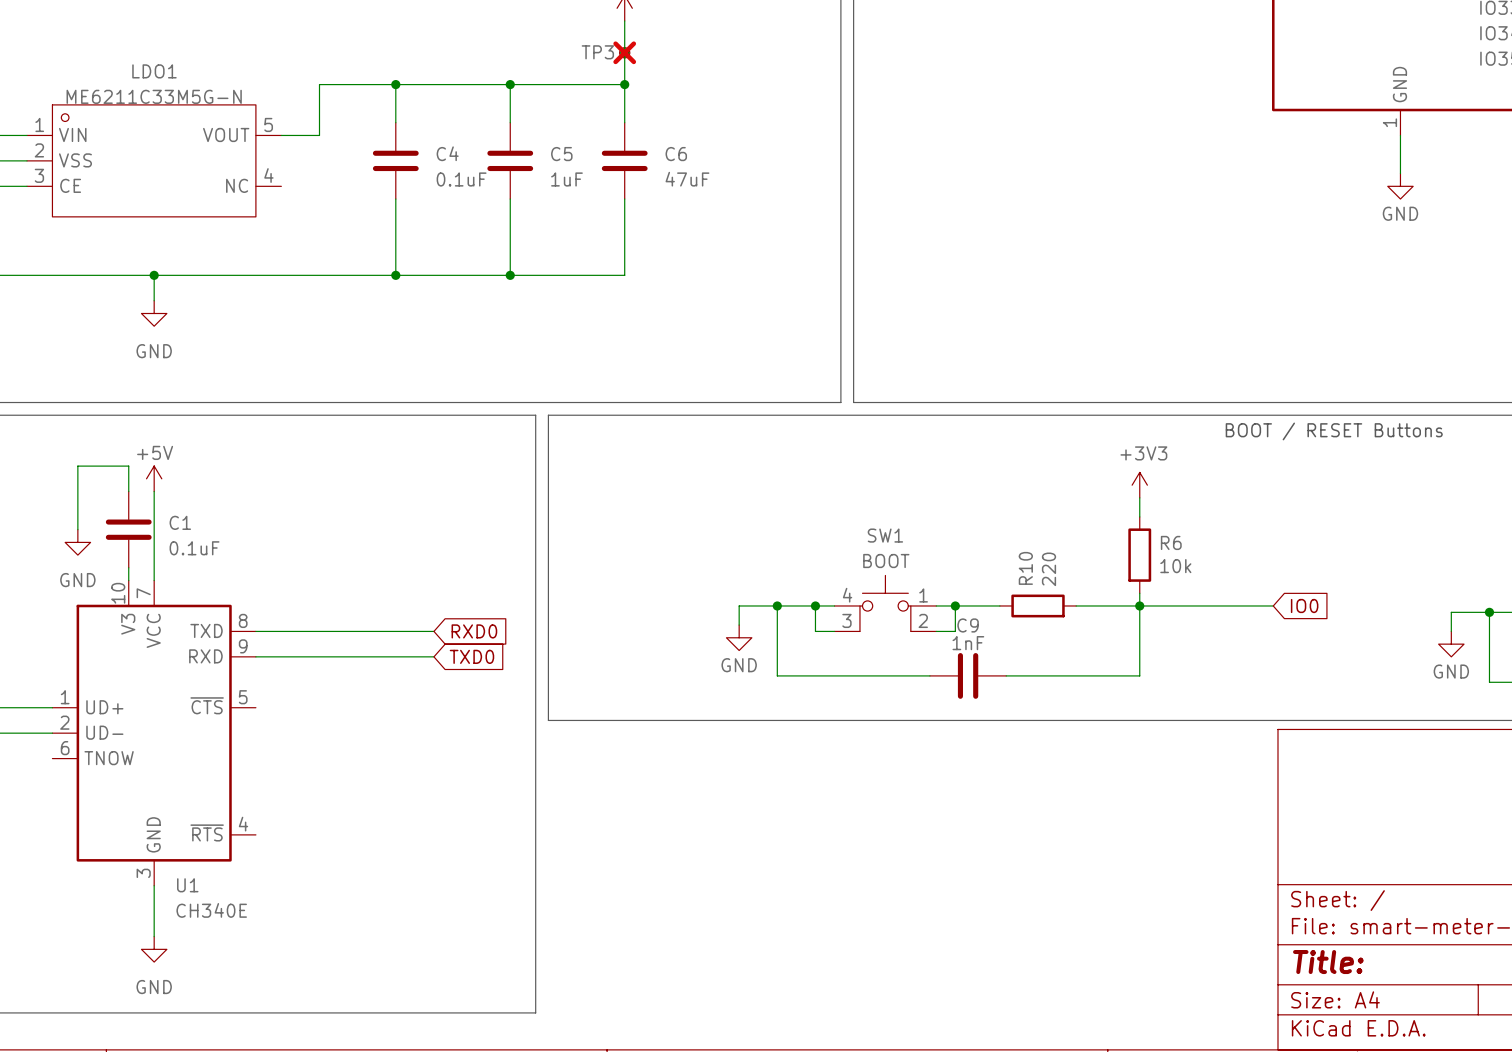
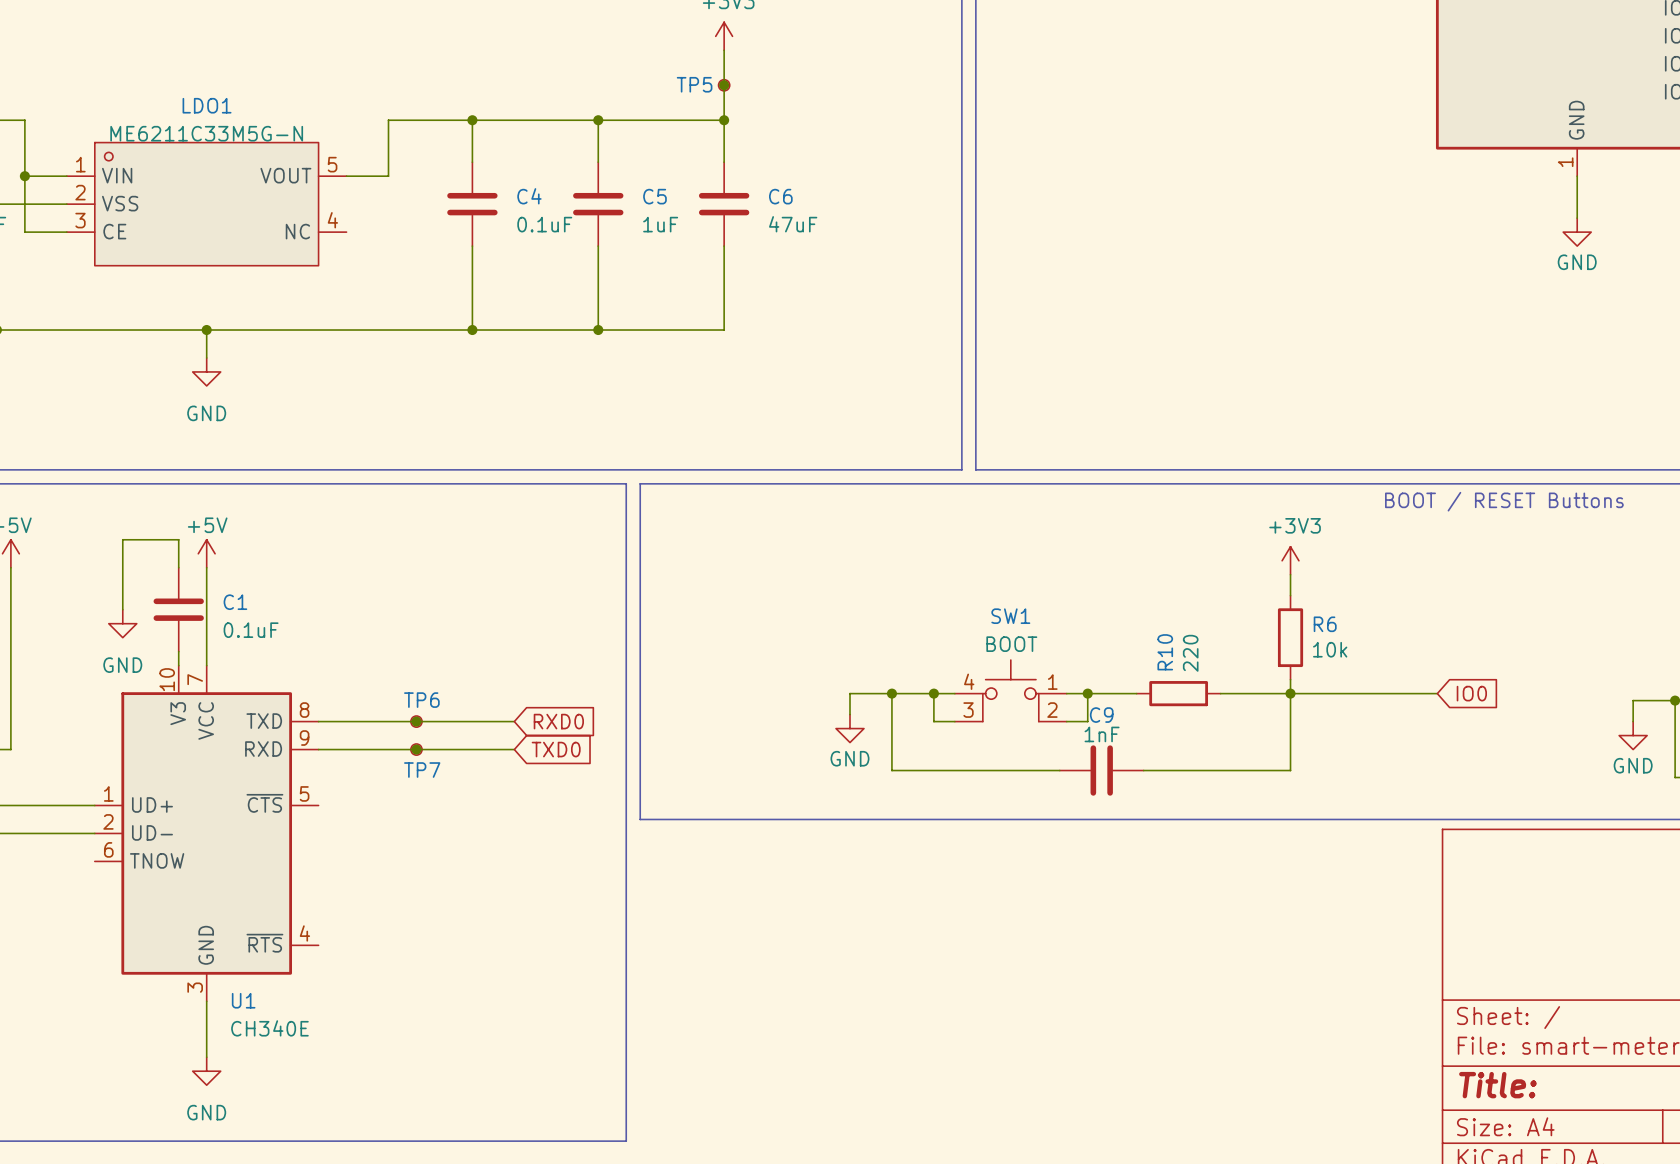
TP3 name: TP3 (597, 52) -> TP5 (694, 84)
TP3 do-not-place cross: (624, 52) -> none
TP6: none -> (416, 721)
junction: none -> (416, 721)
TP7: none -> (416, 749)
junction: none -> (416, 749)

